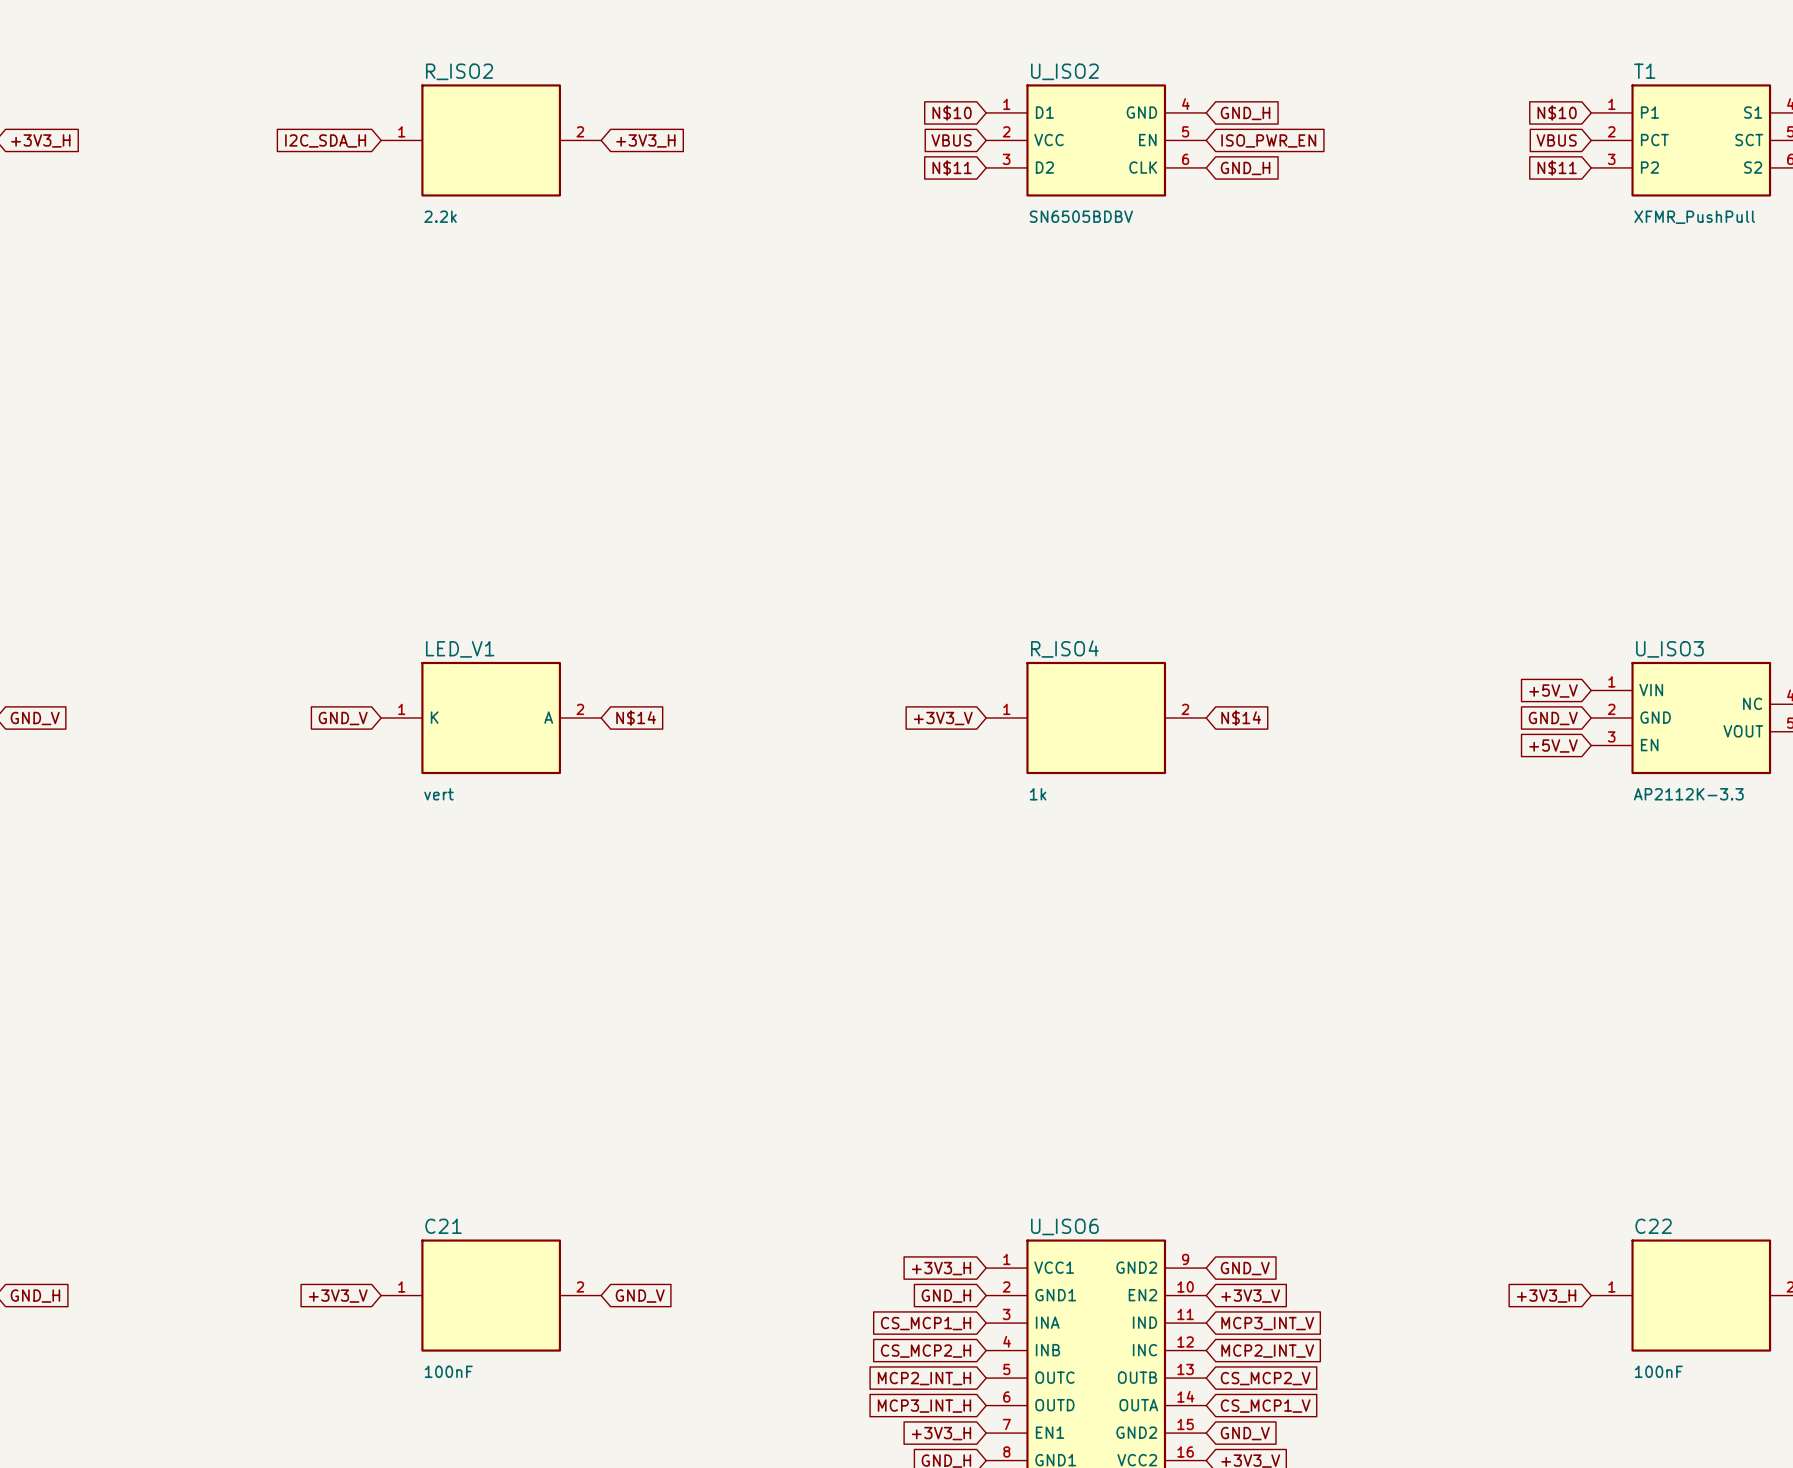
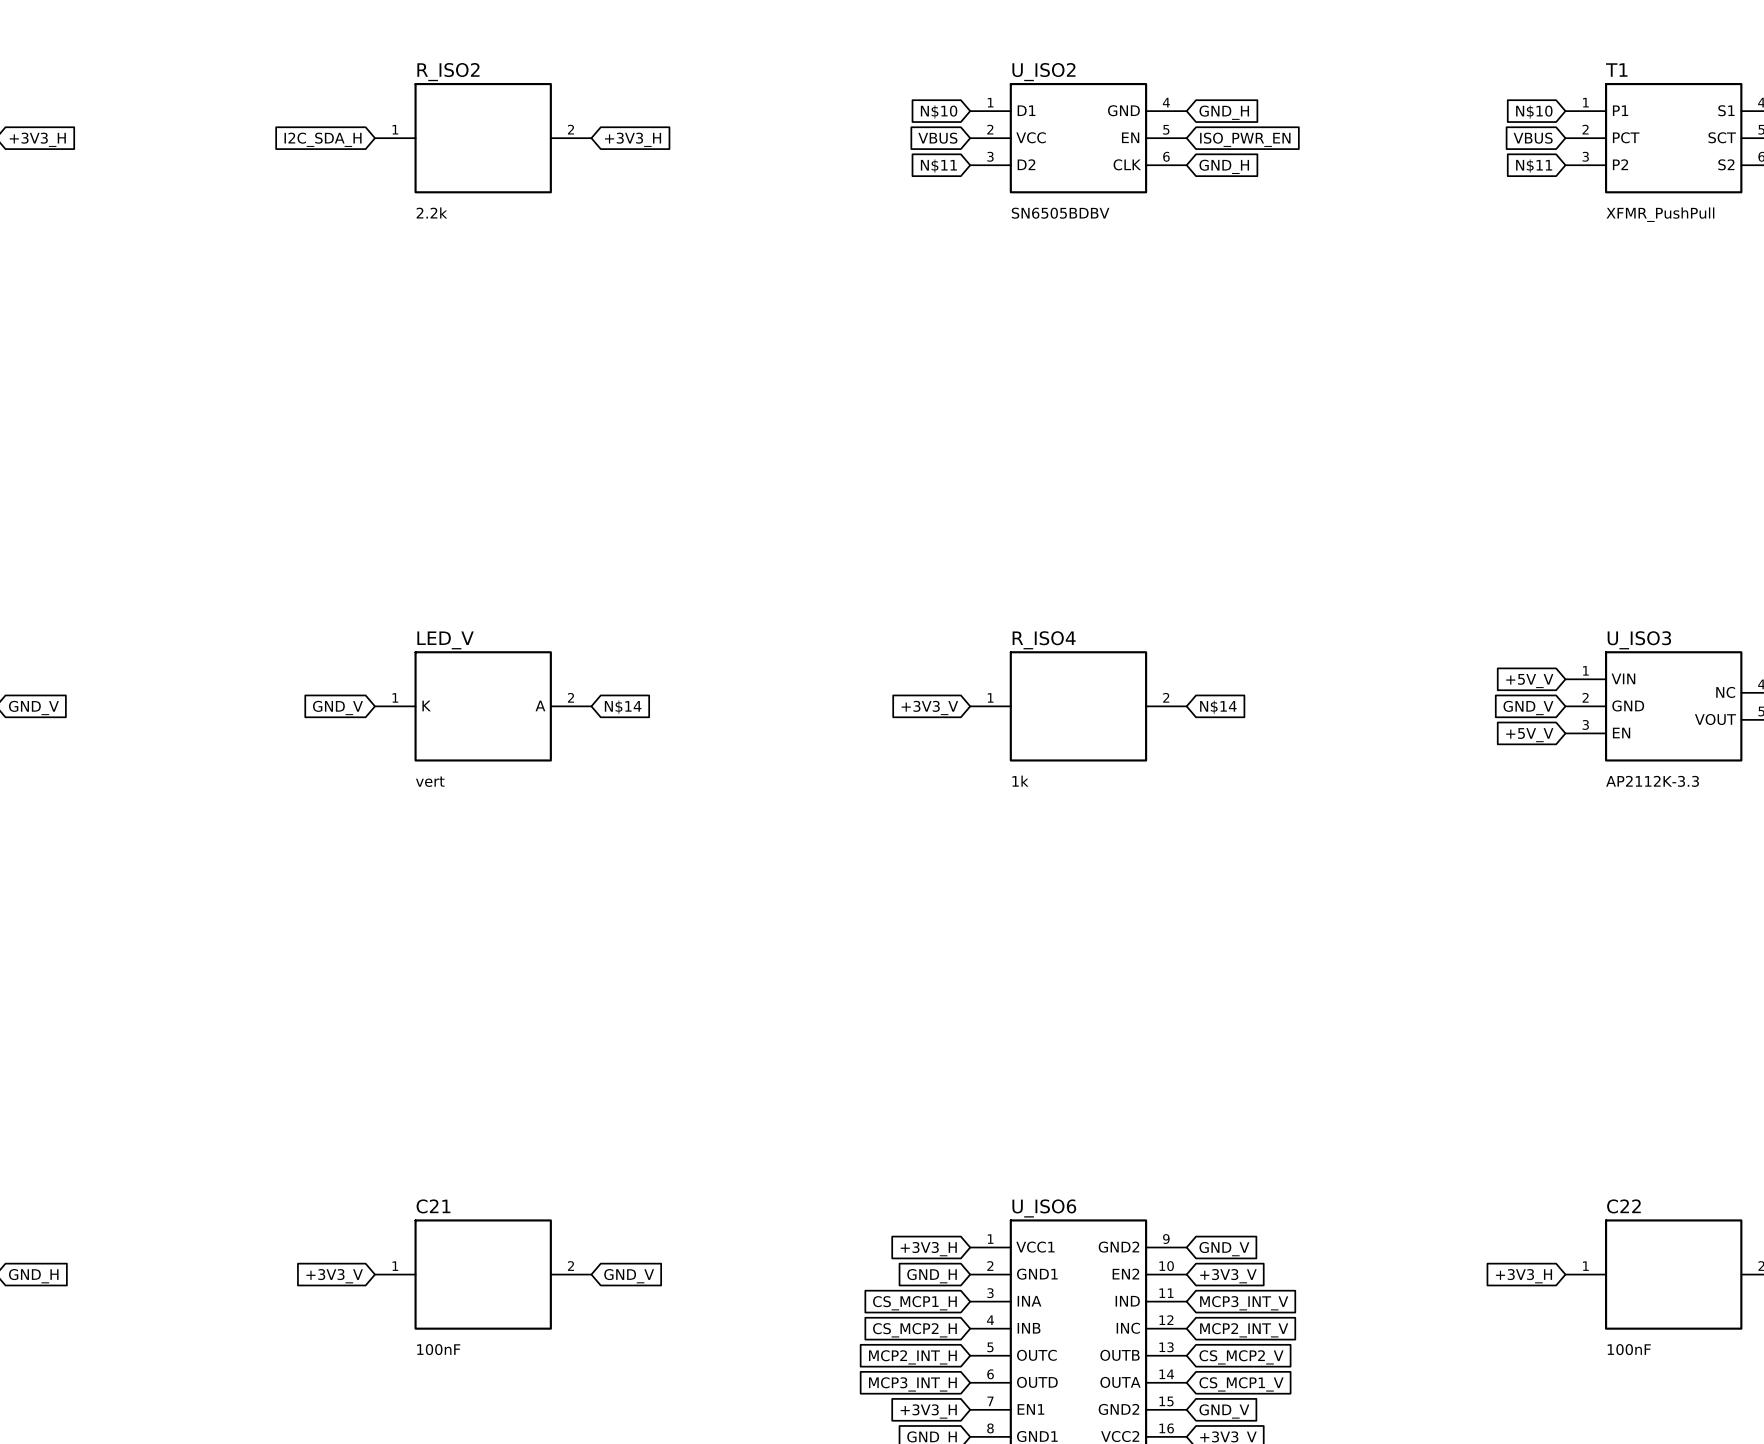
LED_V1 name: LED_V1 (460, 649) -> LED_V (445, 640)

